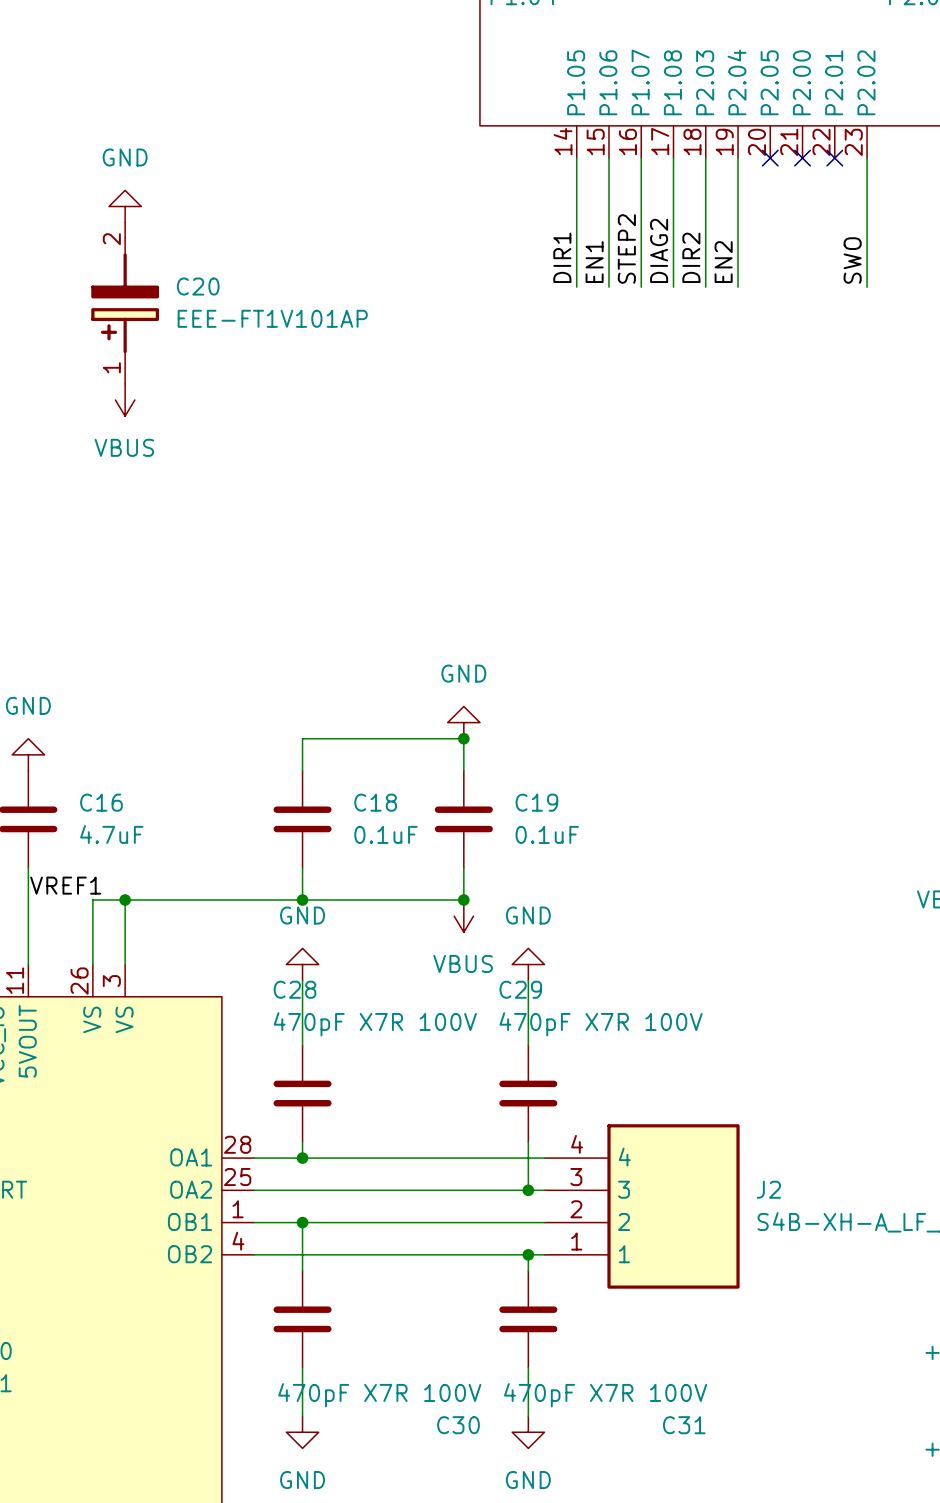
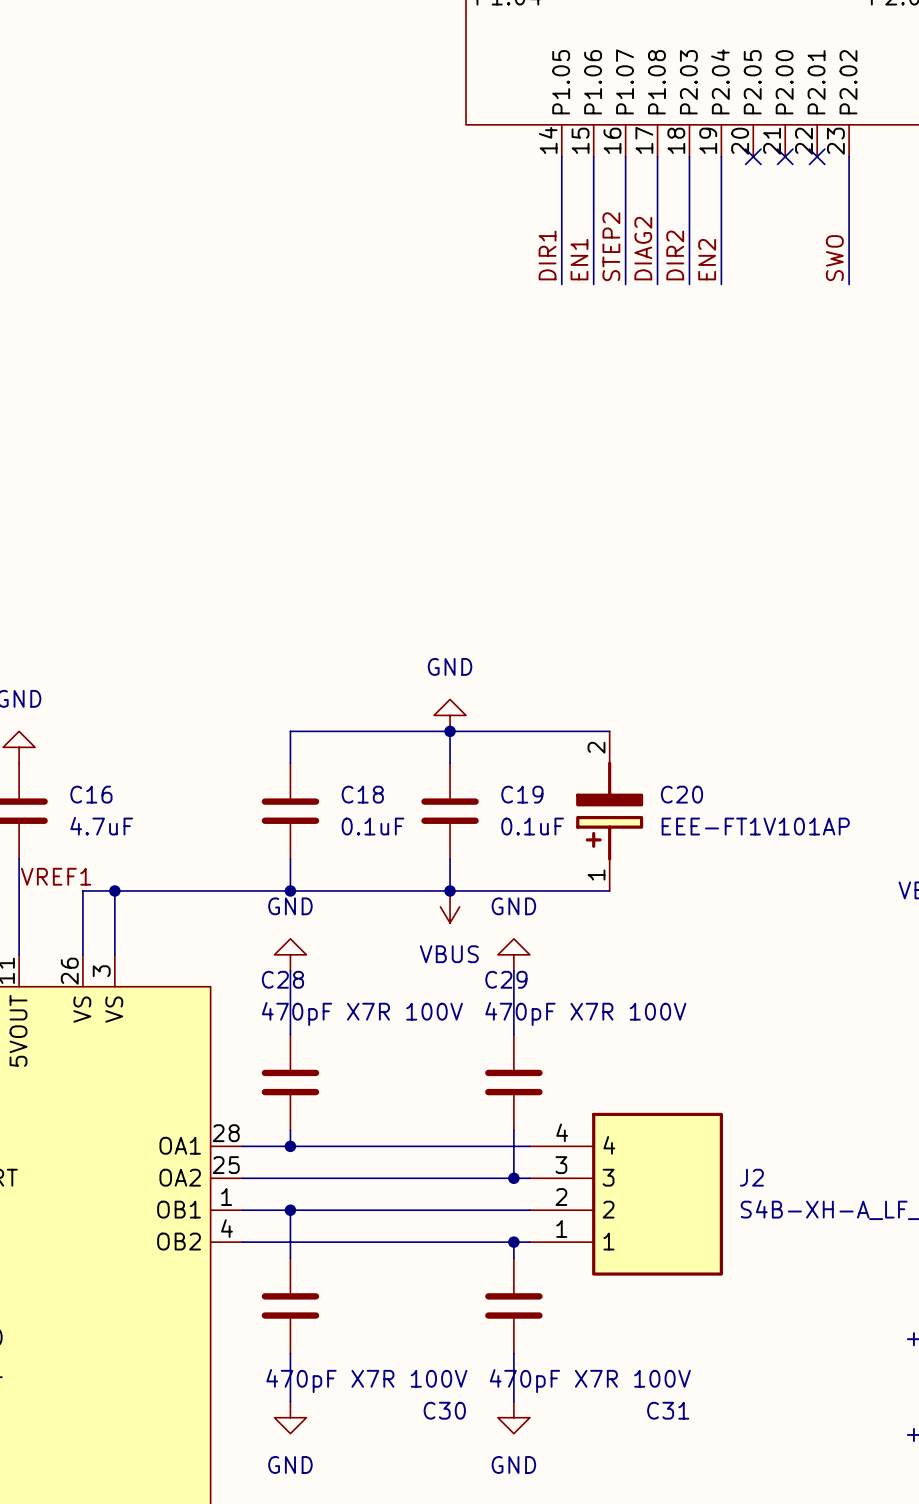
power symbol: GND (125, 206) -> none
C20 position: (125, 303) -> (609, 811)
power symbol: VBUS (125, 400) -> none
wire: none -> (450, 731) (609, 731)
wire: none -> (450, 890) (609, 890)

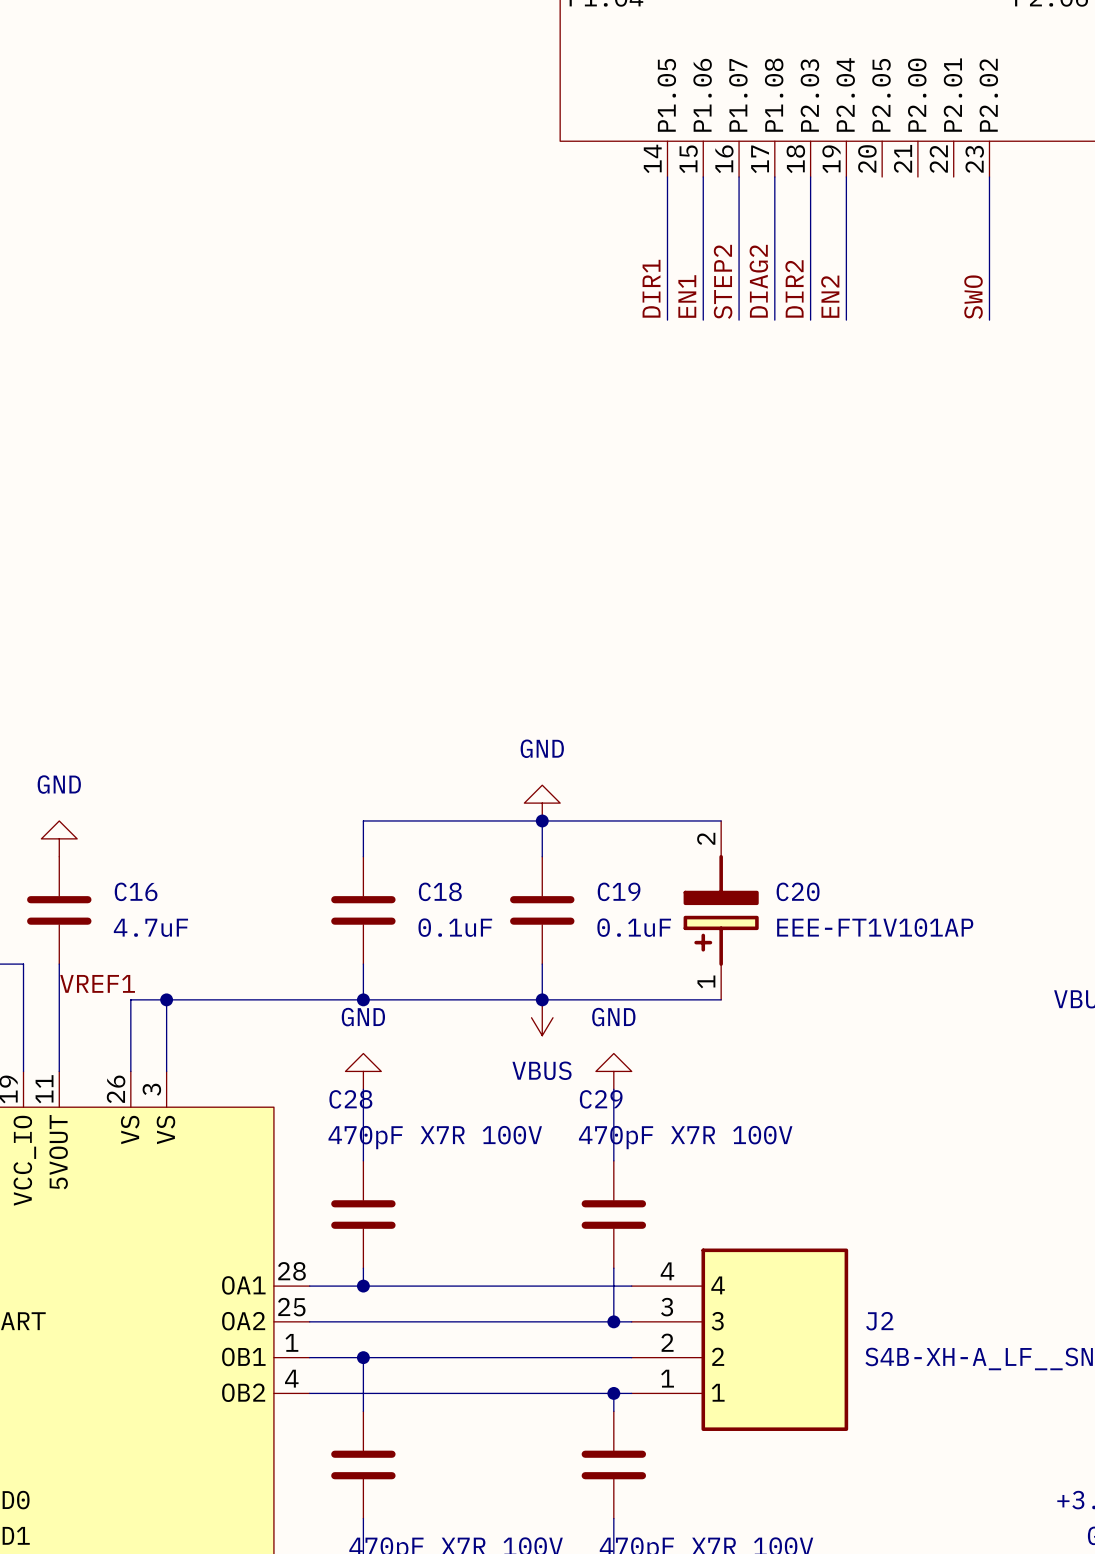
no-connect mark: (753, 156) -> none
no-connect mark: (785, 156) -> none
no-connect mark: (817, 156) -> none

